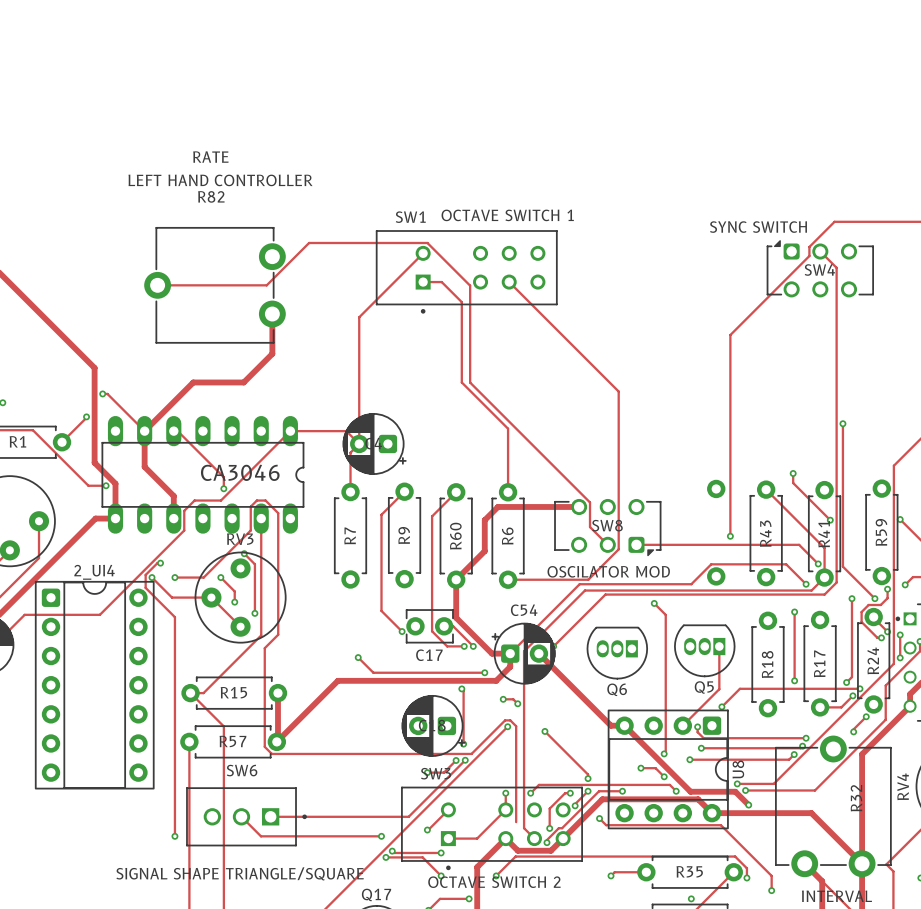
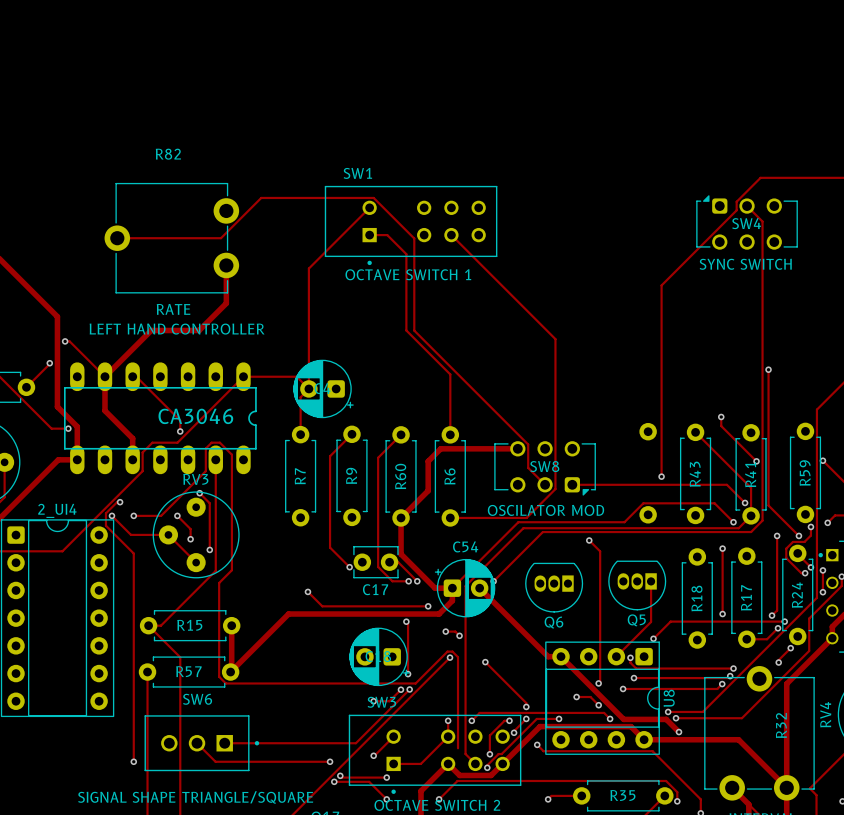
R82 text position: RATE (210, 157) -> RATE (173, 309)
R82 text position: LEFT HAND CONTROLLER (220, 180) -> LEFT HAND CONTROLLER (177, 329)
SW1 text position: OCTAVE SWITCH 1 (507, 215) -> OCTAVE SWITCH 1 (408, 274)
SW4 text position: SYNC SWITCH (758, 227) -> SYNC SWITCH (745, 264)

